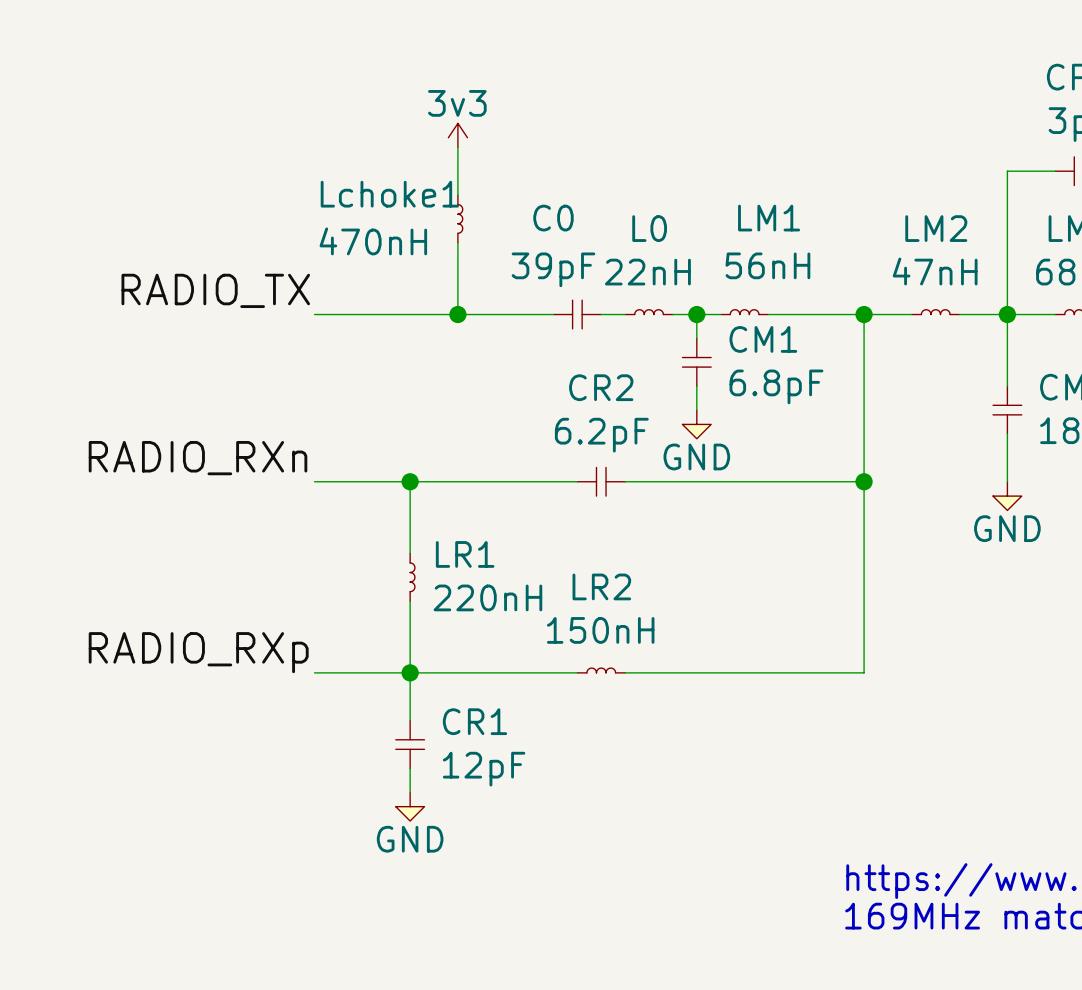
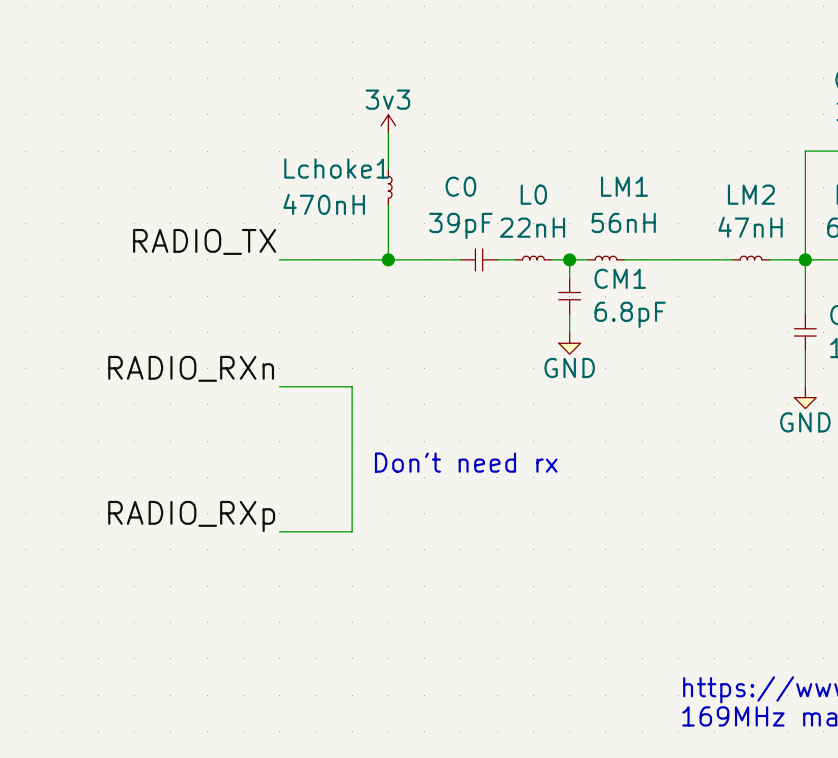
wire: (864, 314) (864, 672) (625, 672) -> none
junction: (864, 314) -> none
wire: (410, 481) (577, 481) -> none
junction: (410, 481) -> none
CR2: 6.2pF (601, 481) -> none
wire: (625, 481) (864, 481) -> none
junction: (864, 481) -> none
LR1: 220nH (412, 577) -> none
text: none -> Don't need rx (466, 462)
LR2: 150nH (601, 670) -> none
junction: (410, 672) -> none
wire: (577, 672) (410, 672) (410, 720) -> none
CR1: 12pF (410, 744) -> none
wire: (410, 768) (410, 792) -> none
power symbol: GND (410, 806) -> none

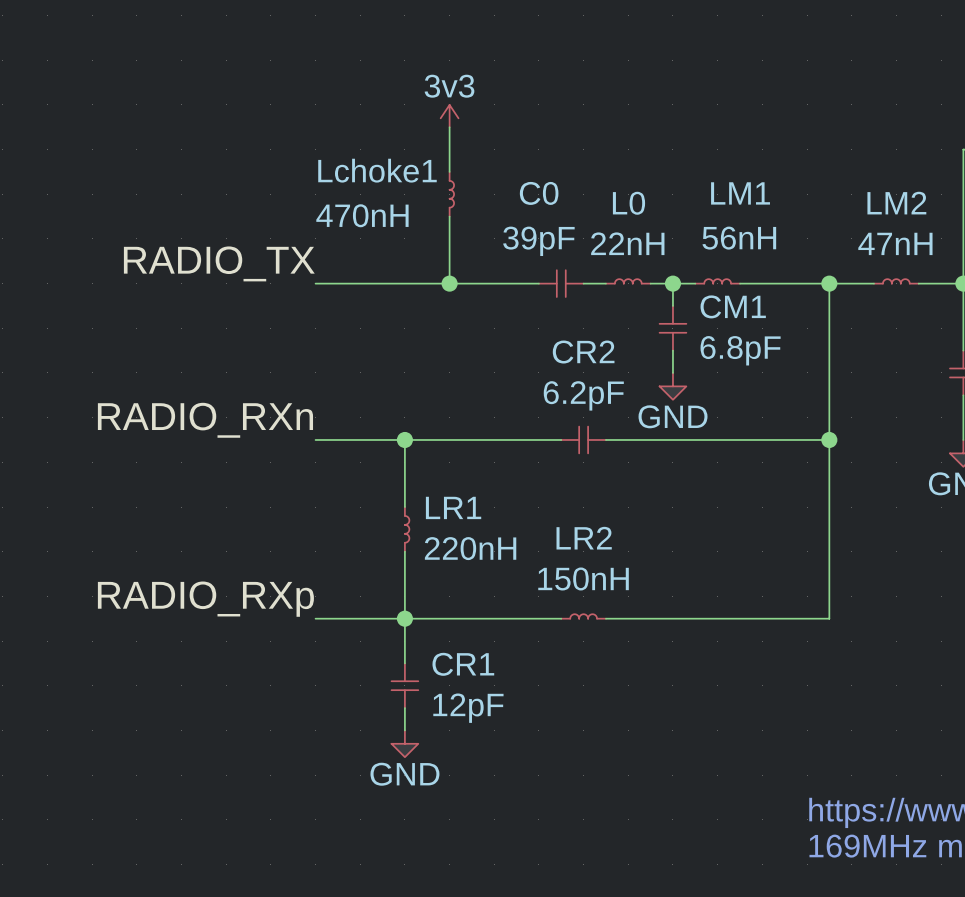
wire: none -> (829, 283) (829, 618) (605, 618)
junction: none -> (829, 283)
wire: none -> (404, 439) (561, 439)
junction: none -> (404, 439)
CR2: none -> 6.2pF (583, 439)
wire: none -> (605, 439) (829, 439)
junction: none -> (829, 439)
LR1: none -> 220nH (407, 529)
text: Don't need rx (466, 462) -> none
LR2: none -> 150nH (583, 616)
junction: none -> (404, 618)
wire: none -> (561, 618) (404, 618) (404, 663)
CR1: none -> 12pF (404, 685)
wire: none -> (404, 708) (404, 730)
power symbol: none -> GND (404, 743)

